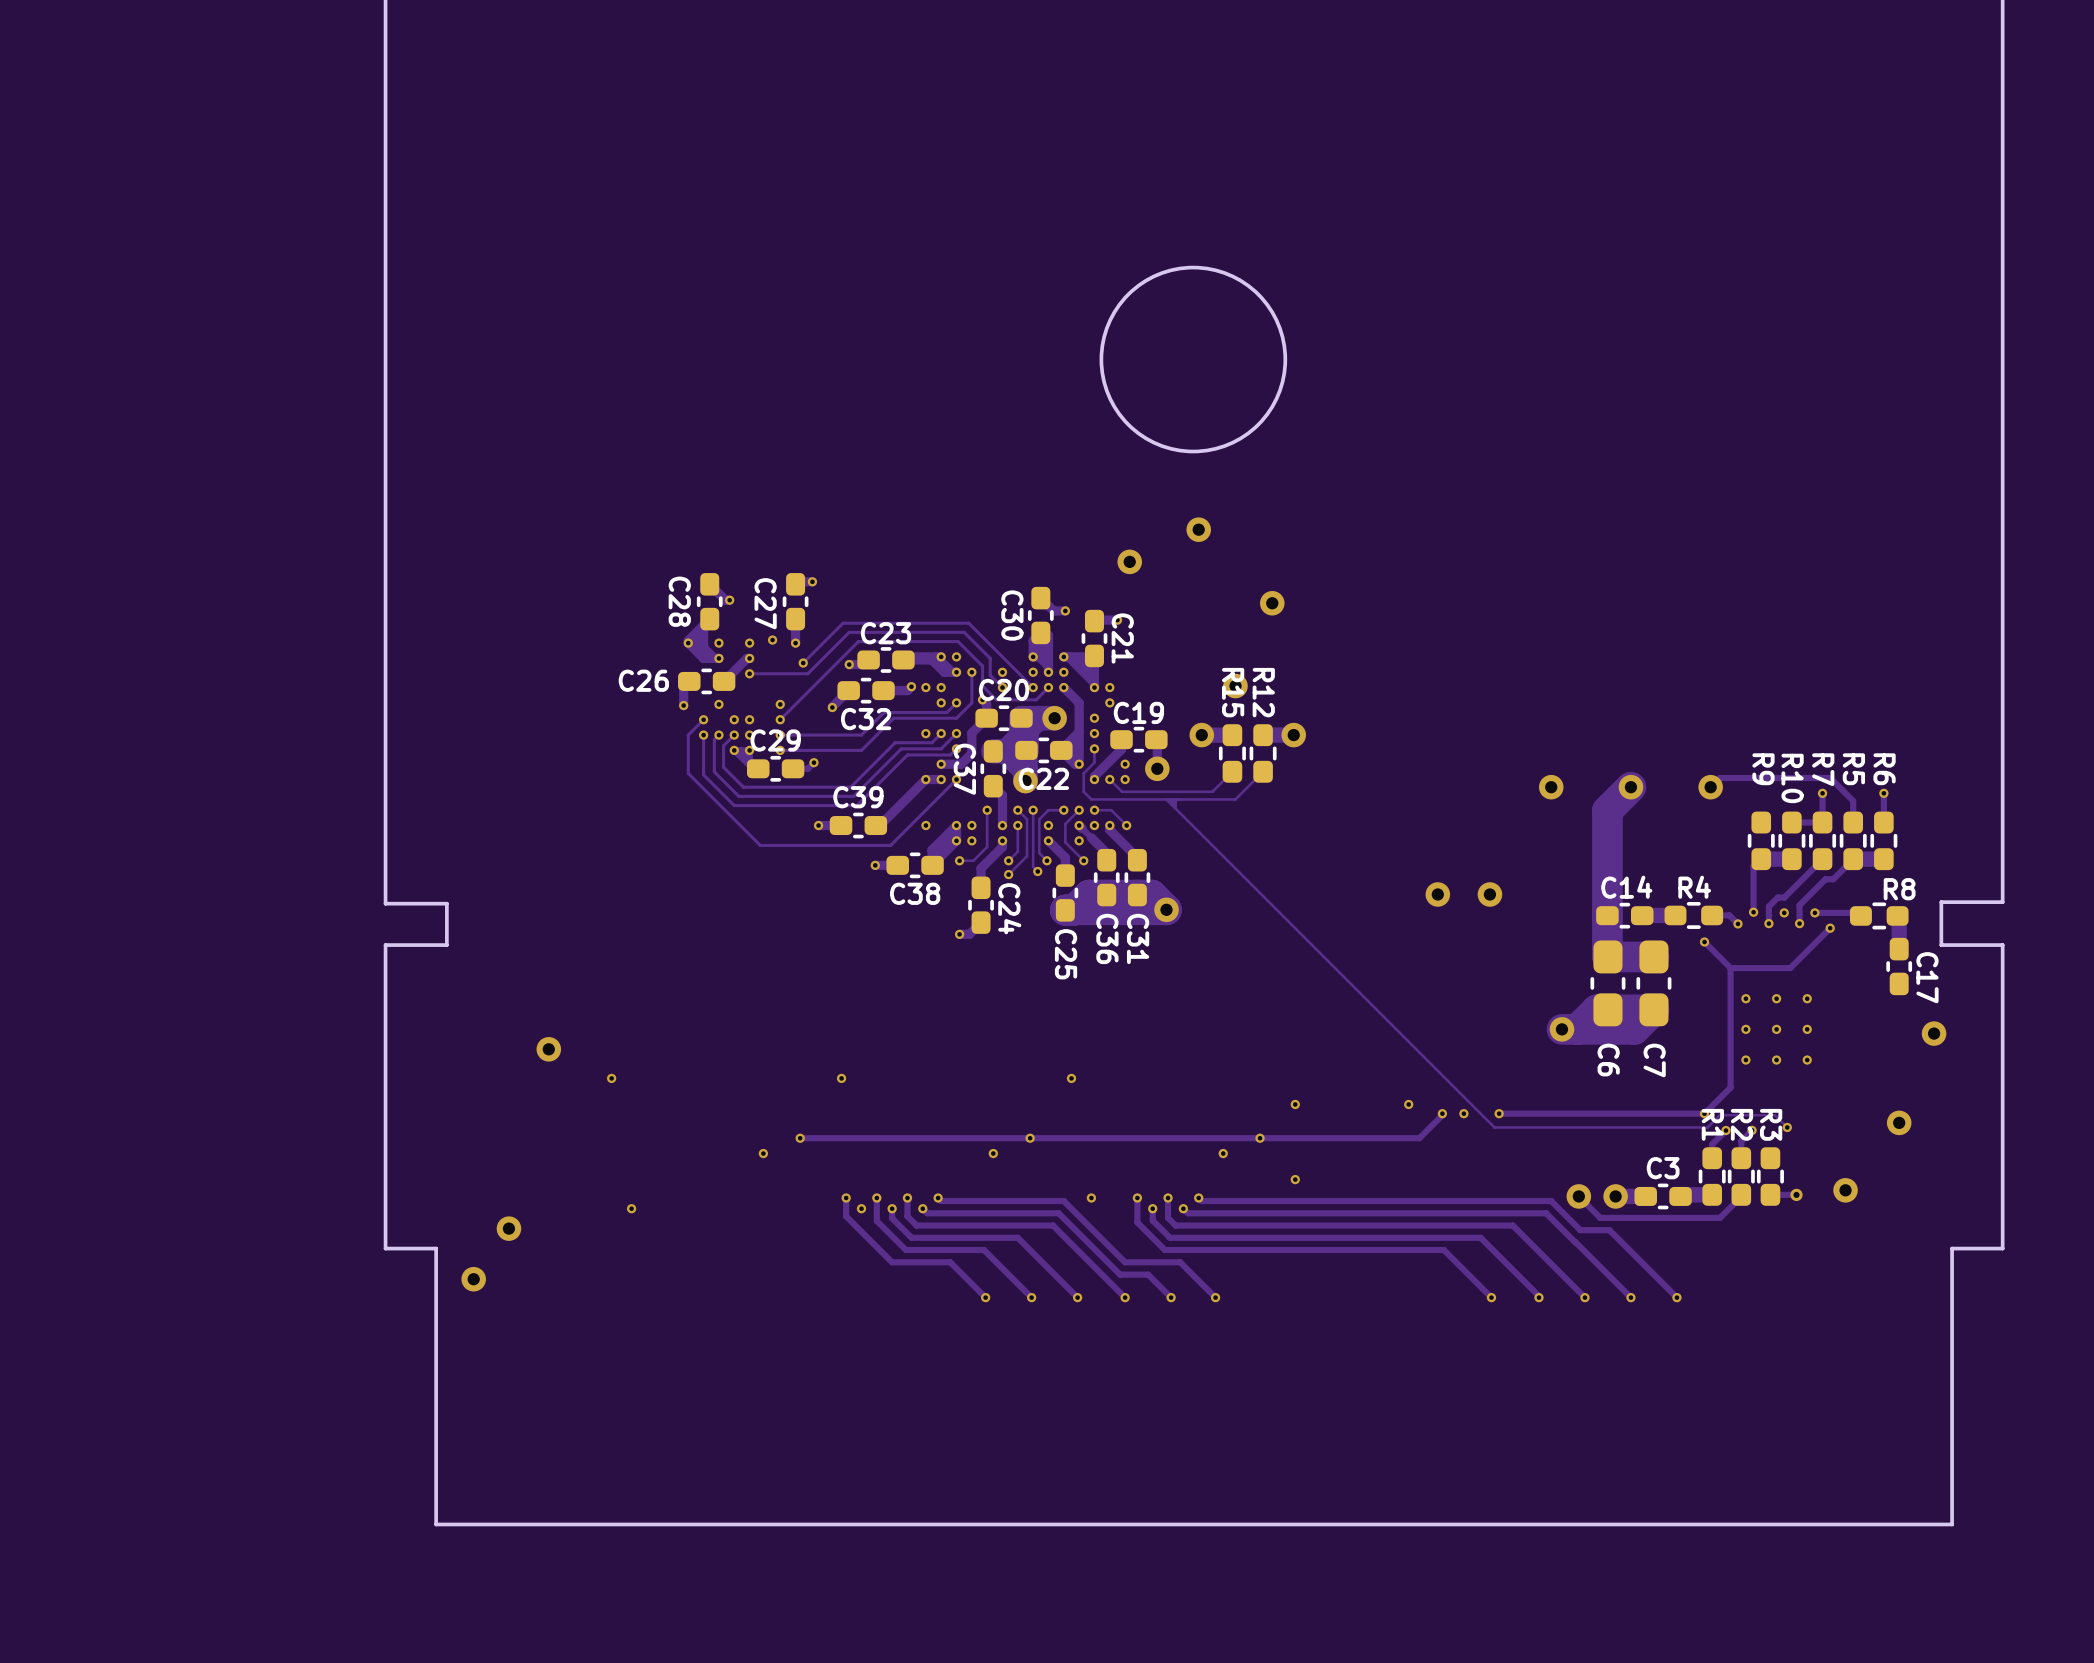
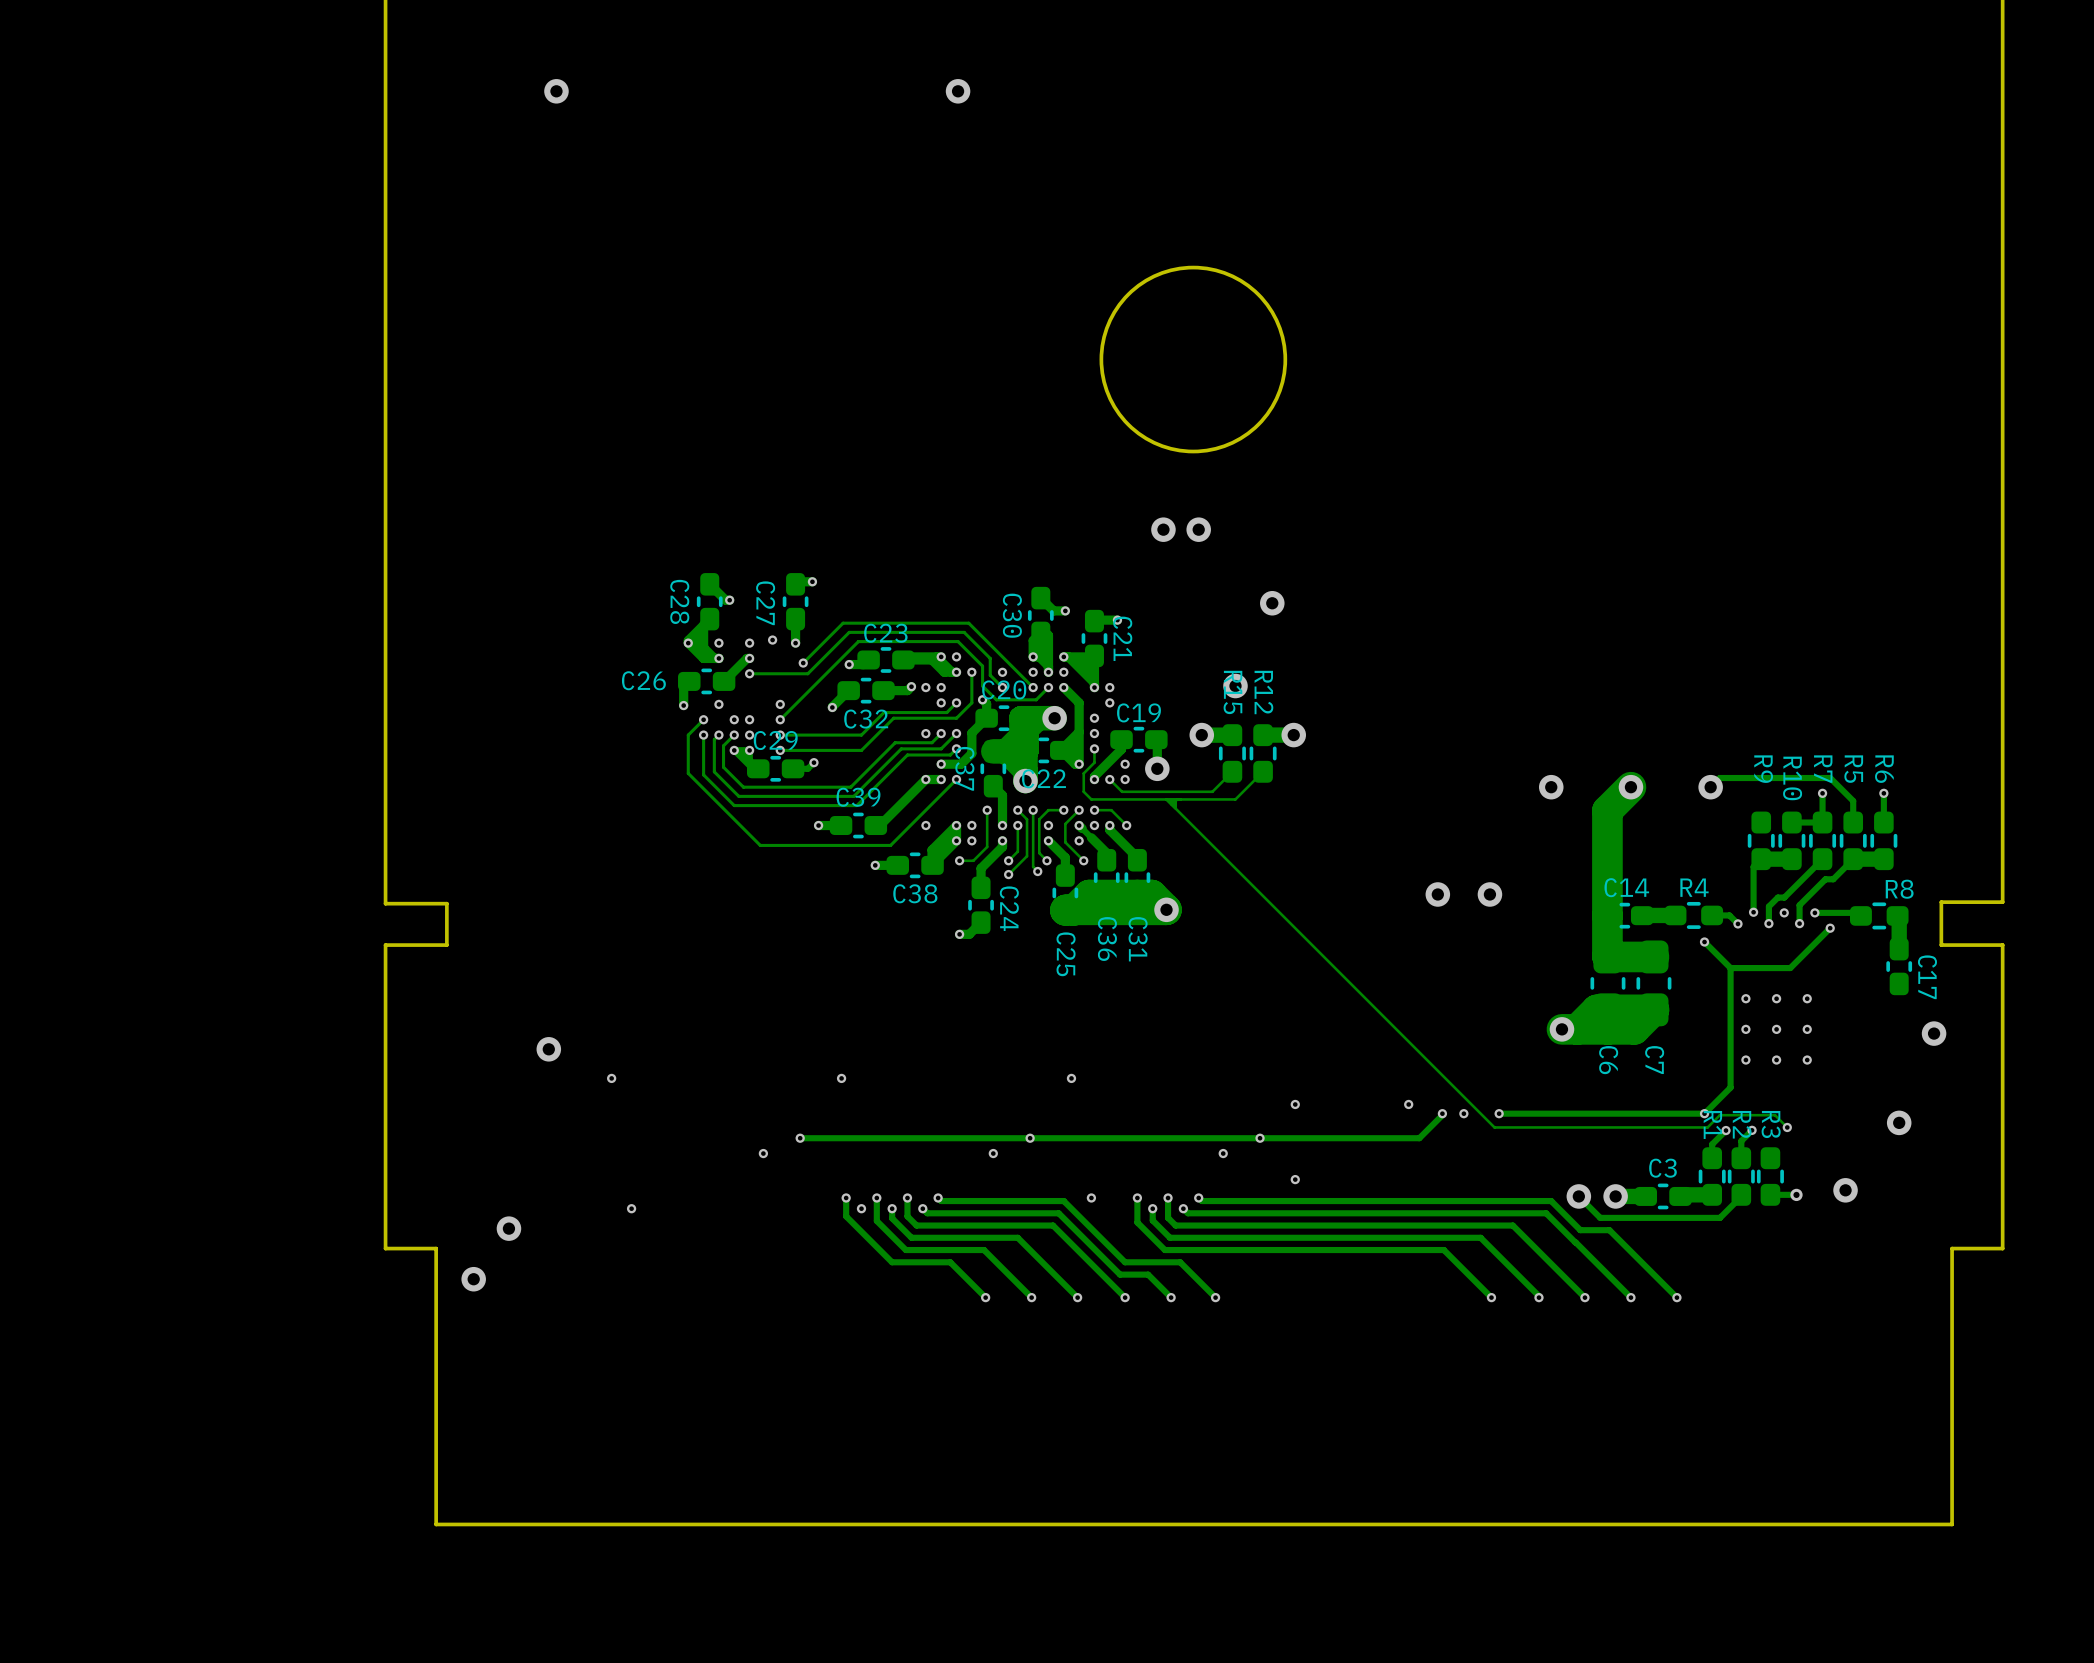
via: none -> (556, 91)
via: none -> (958, 91)
via position: (1129, 561) -> (1163, 529)

